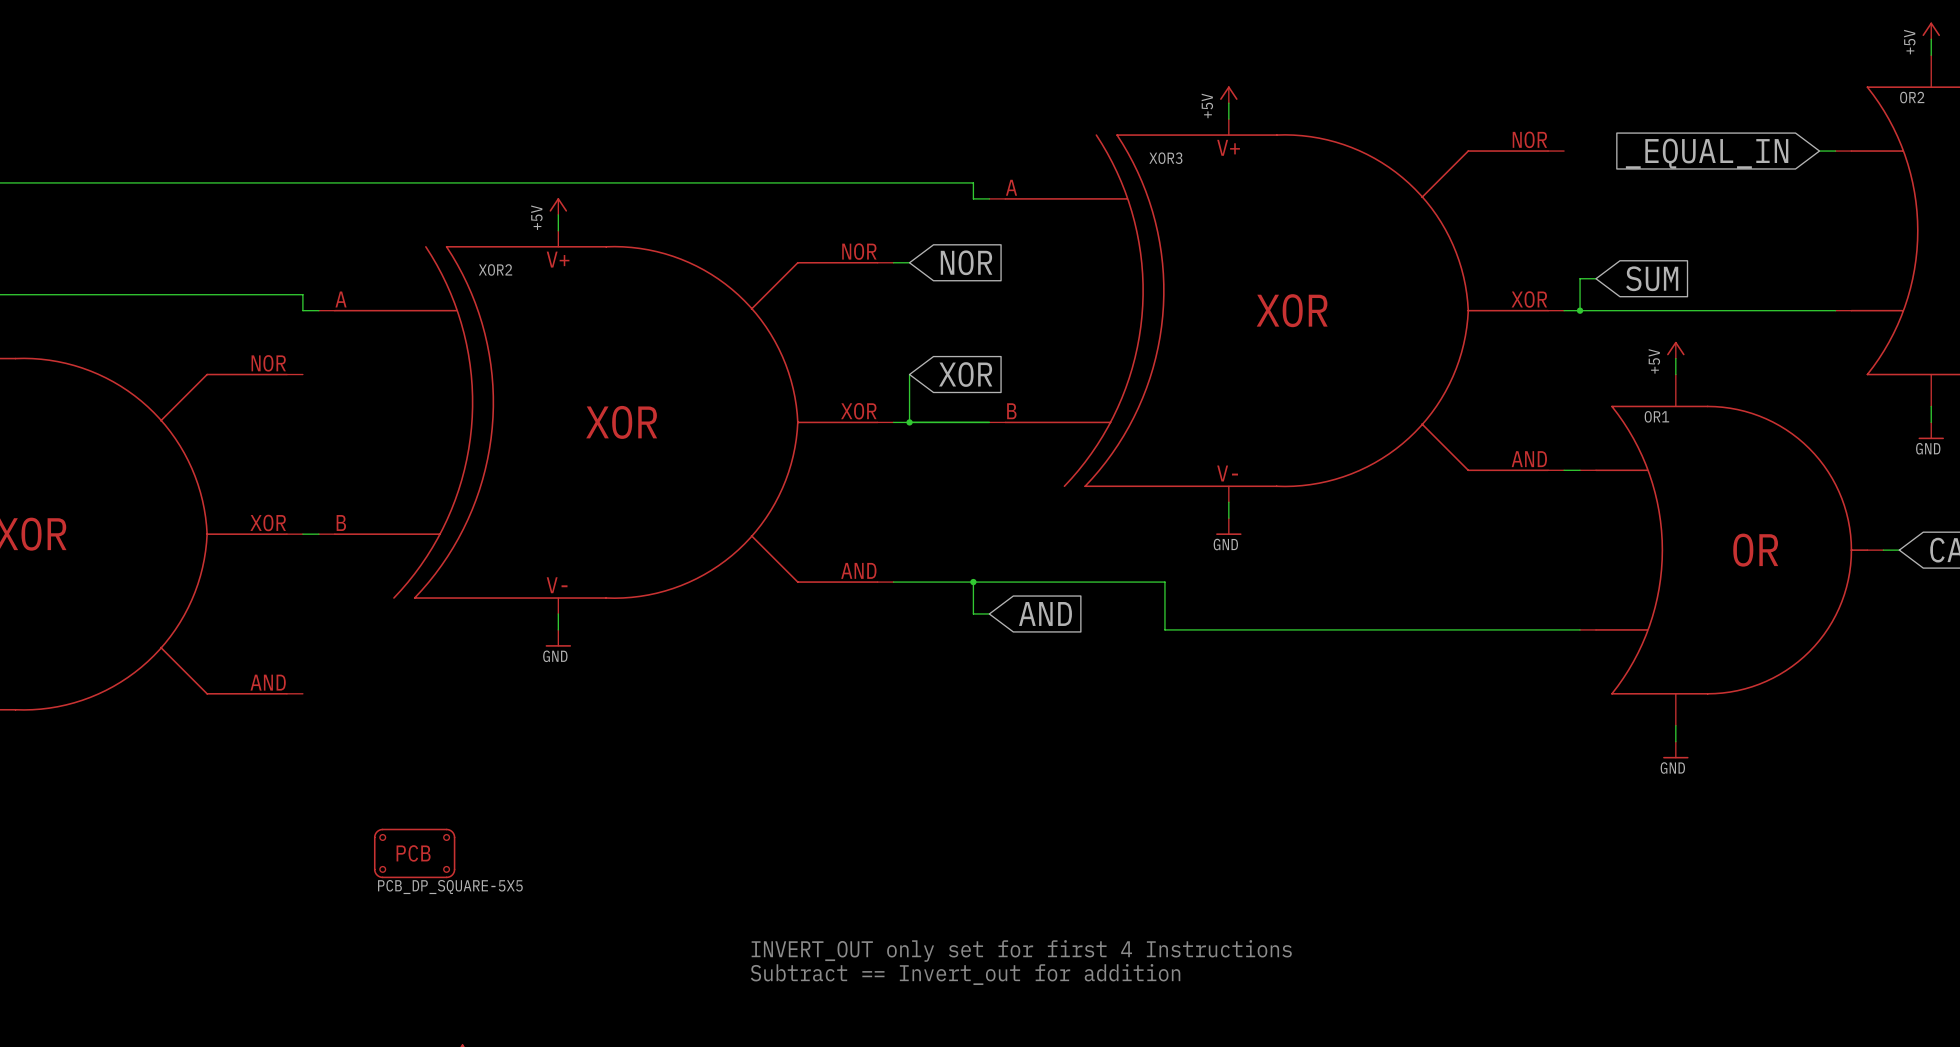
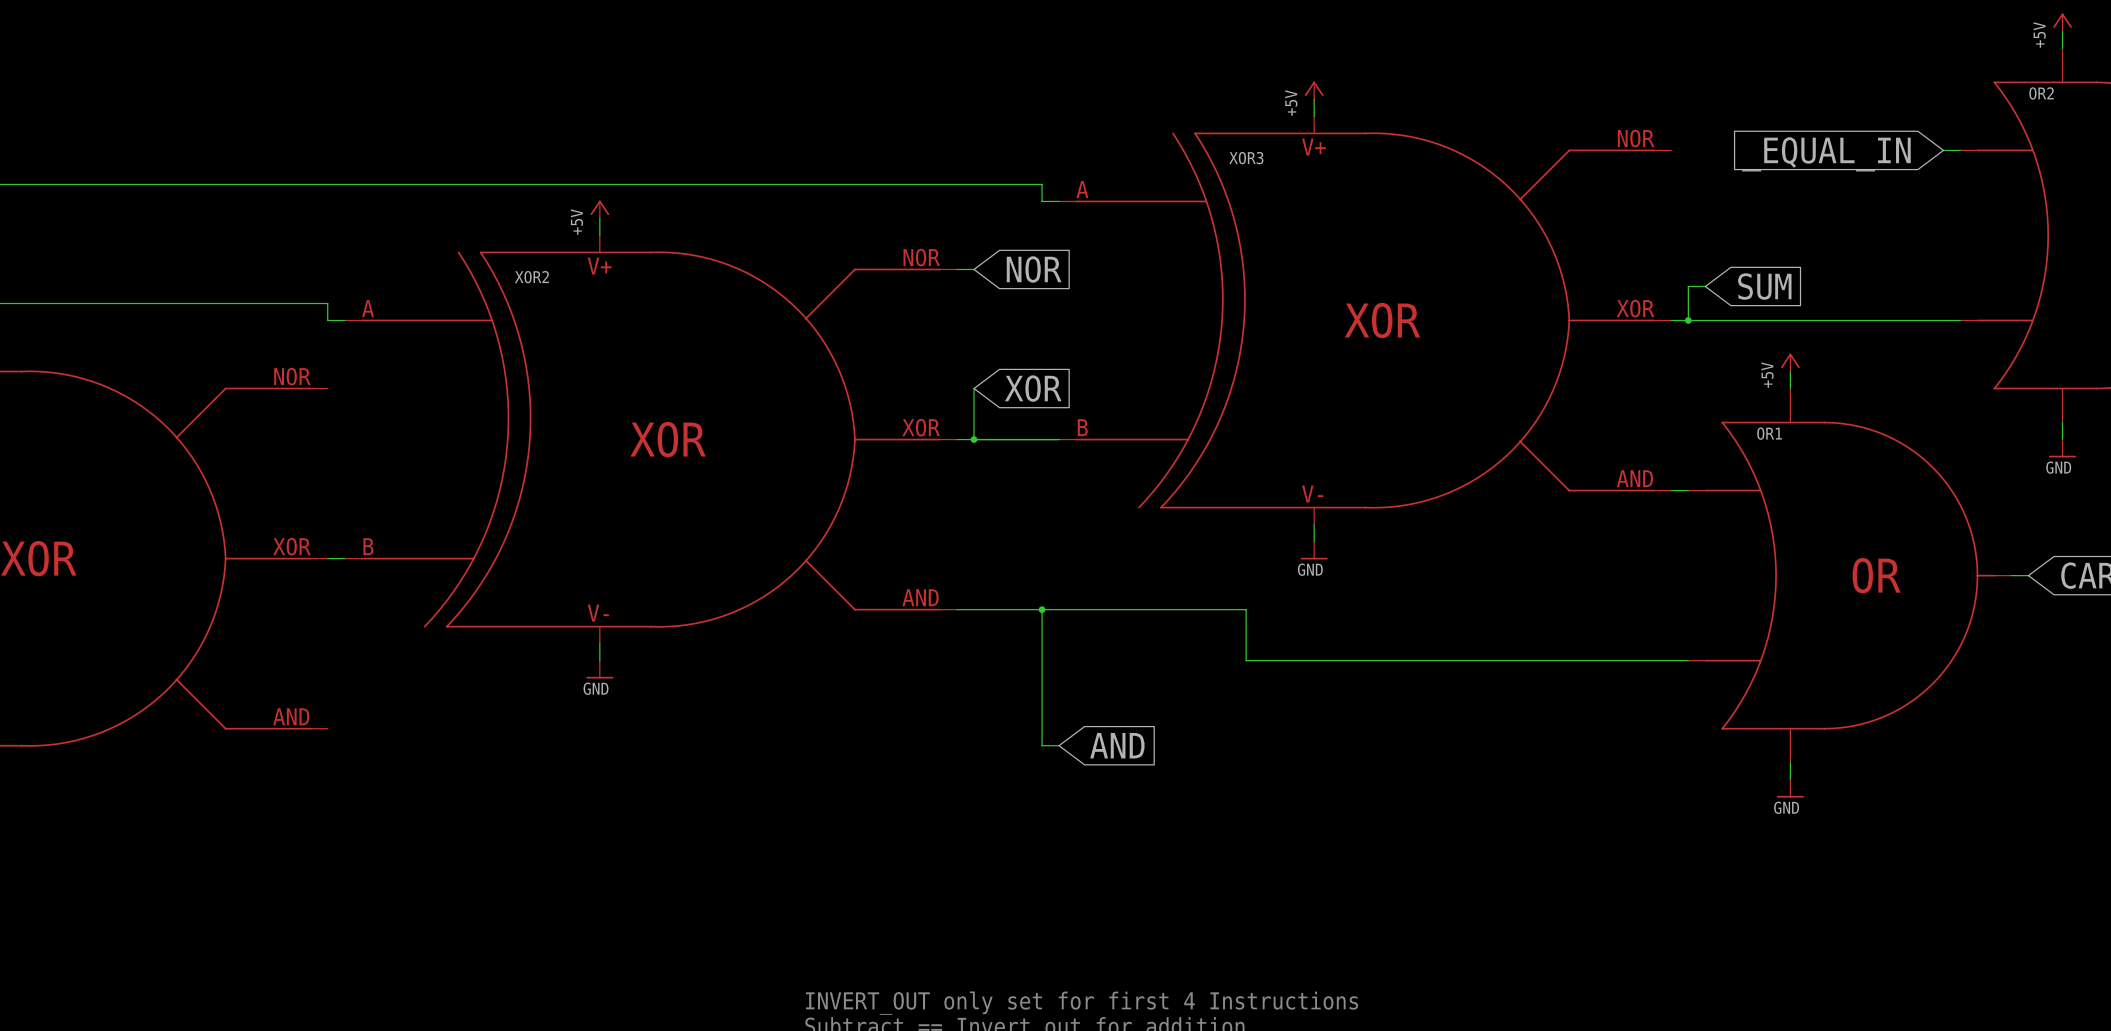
wire: (973, 613) (989, 613) -> (1042, 643) (1042, 745) (1059, 745)
global label position: AND (1045, 613) -> AND (1117, 745)
part: PCB_DP_SQUARE-5X5 (414, 853) -> none

